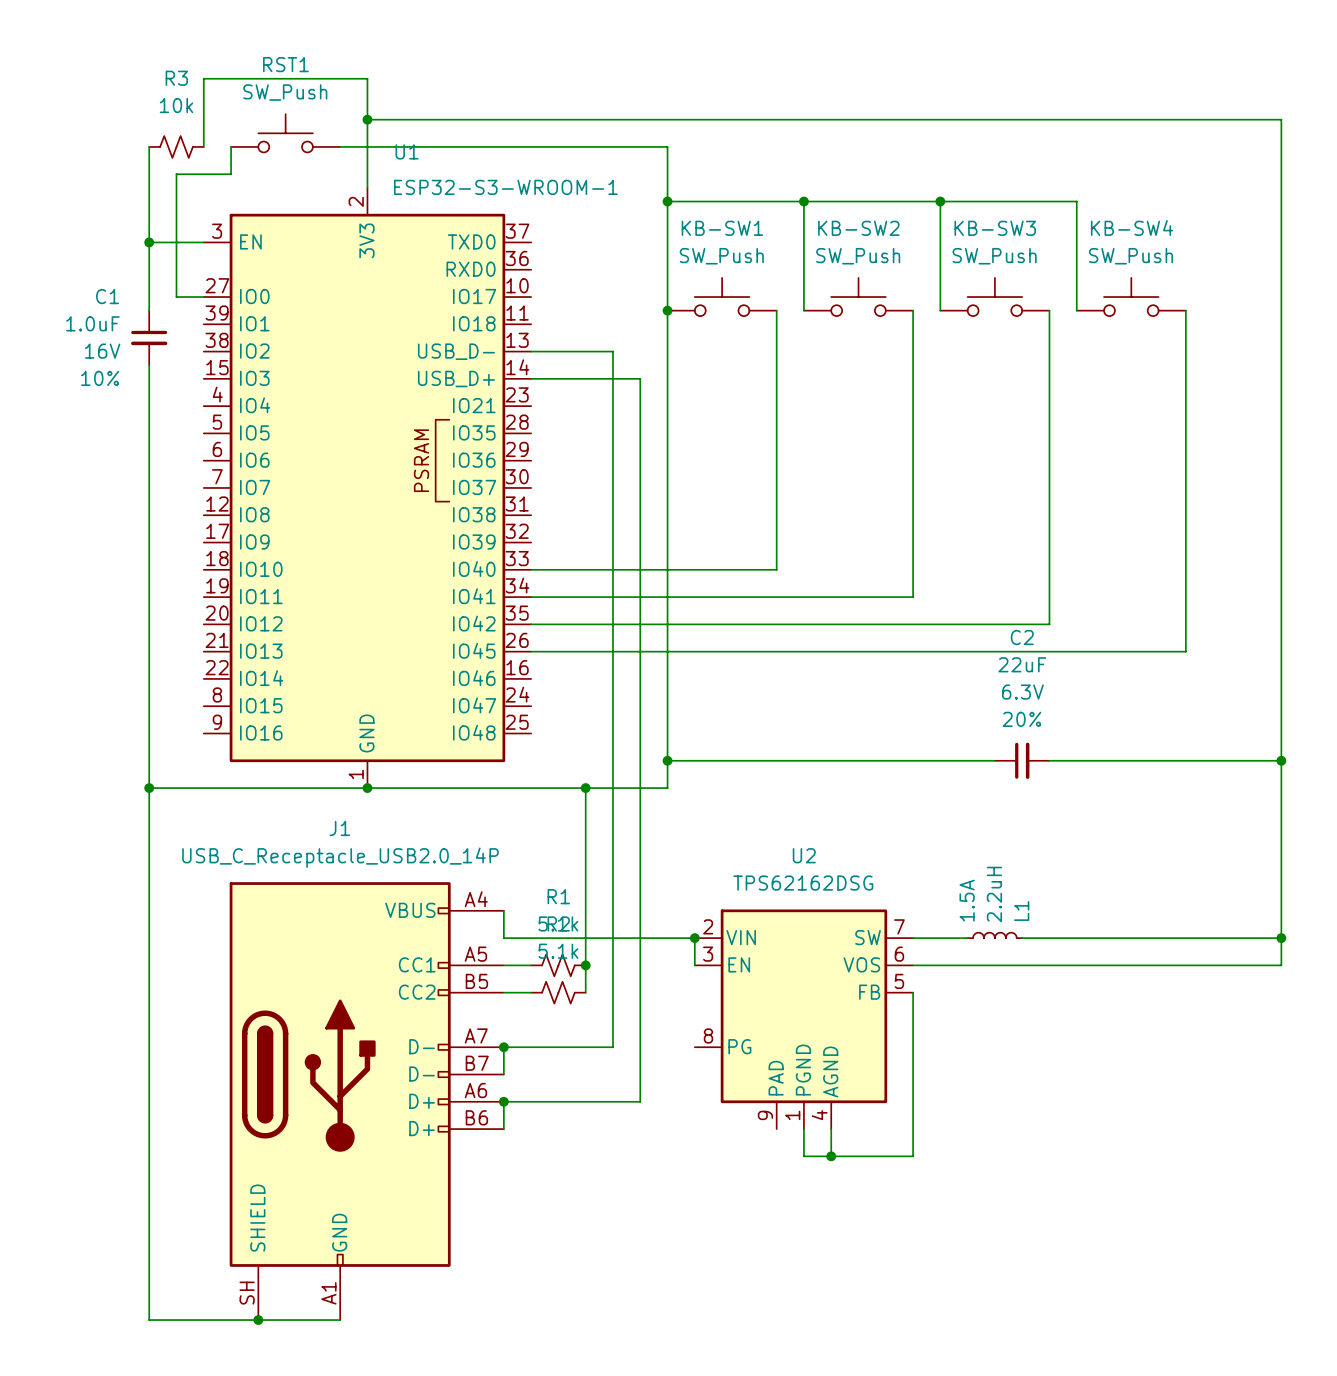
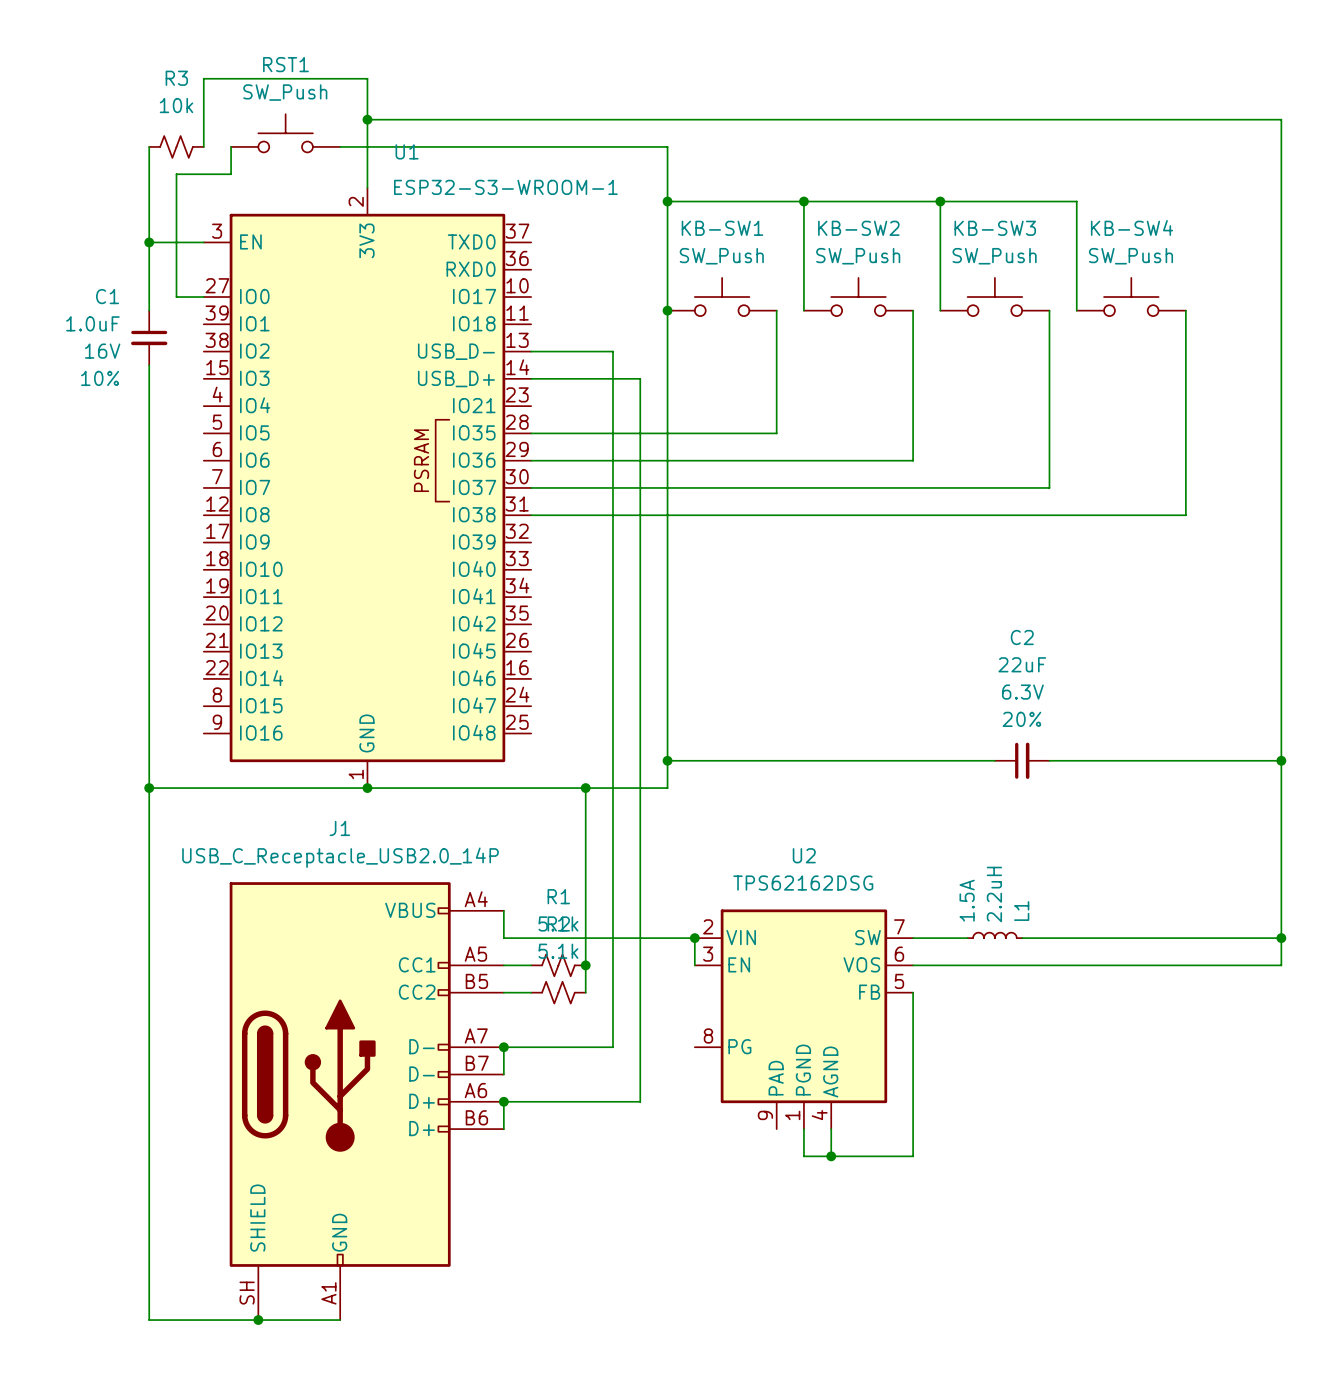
wire: (776, 433) (776, 569) (531, 569) -> (776, 433) (531, 433)
wire: (913, 460) (913, 597) (531, 597) -> (913, 460) (531, 460)
wire: (1049, 487) (1049, 624) (531, 624) -> (1049, 487) (531, 487)
wire: (1185, 515) (1185, 651) (531, 651) -> (1185, 515) (531, 515)

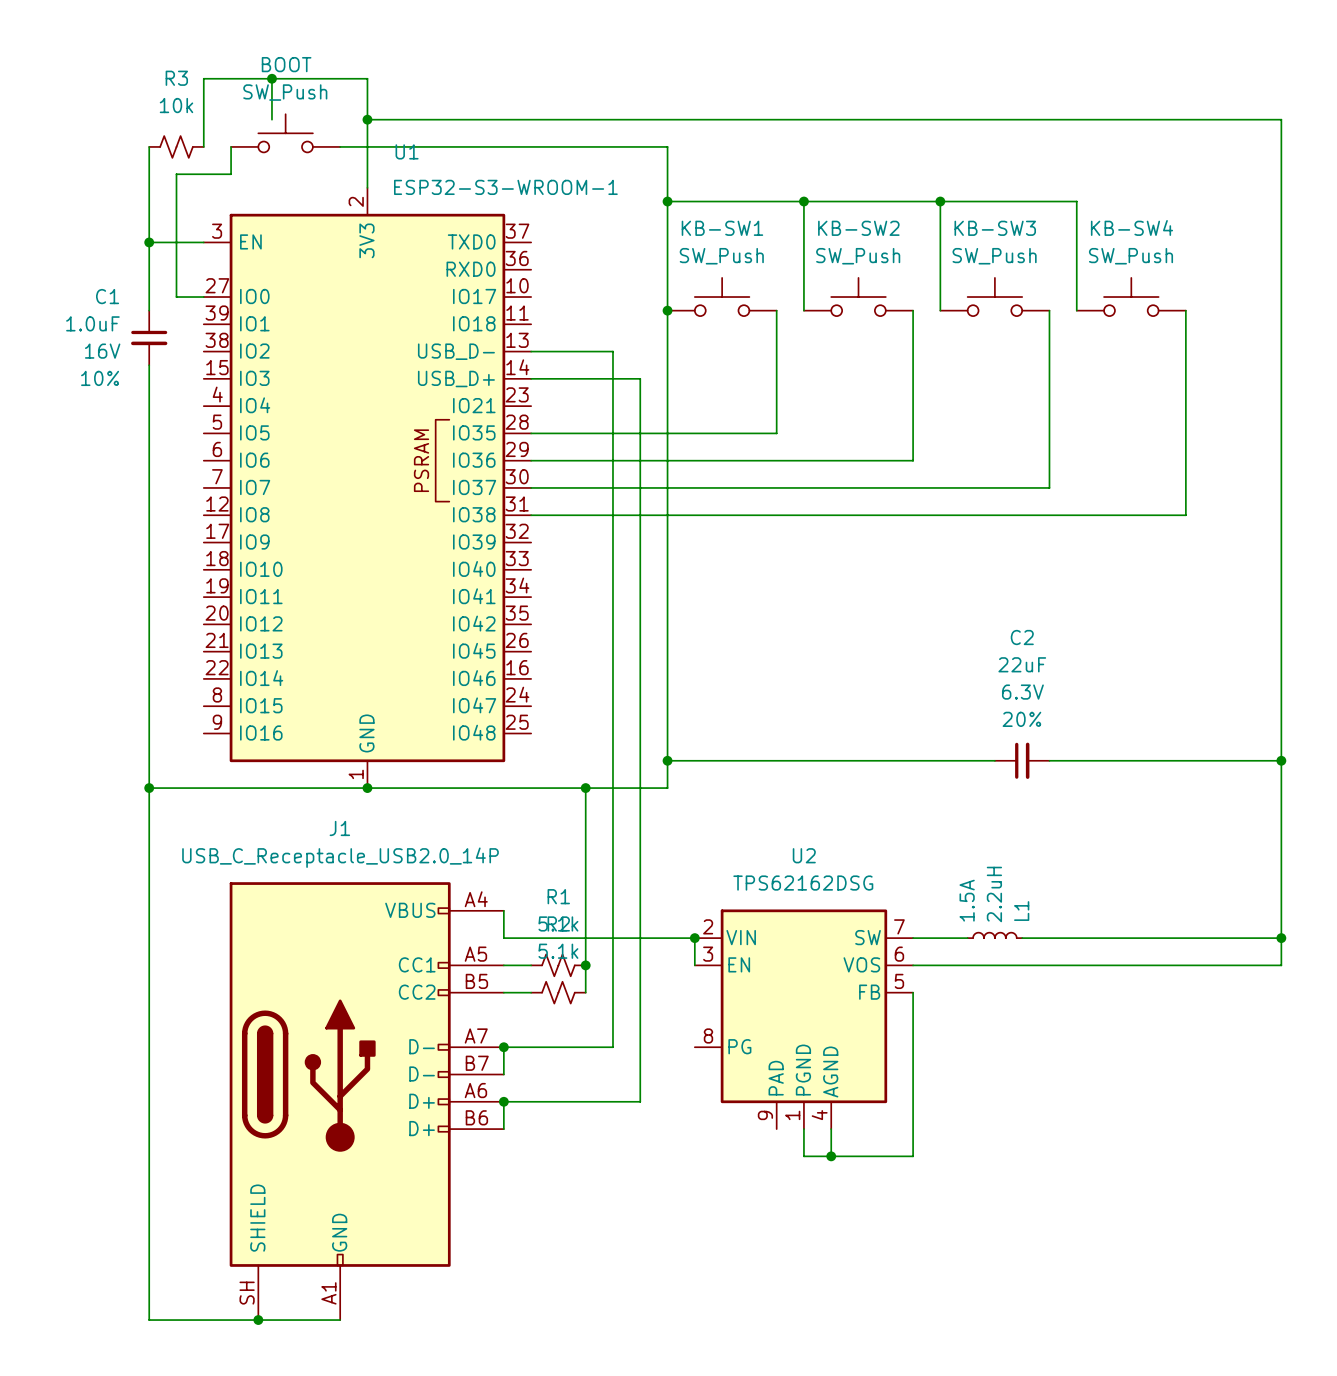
RST1 name: RST1 (285, 64) -> BOOT (286, 64)
wire: none -> (271, 78) (271, 119)
junction: none -> (271, 78)

